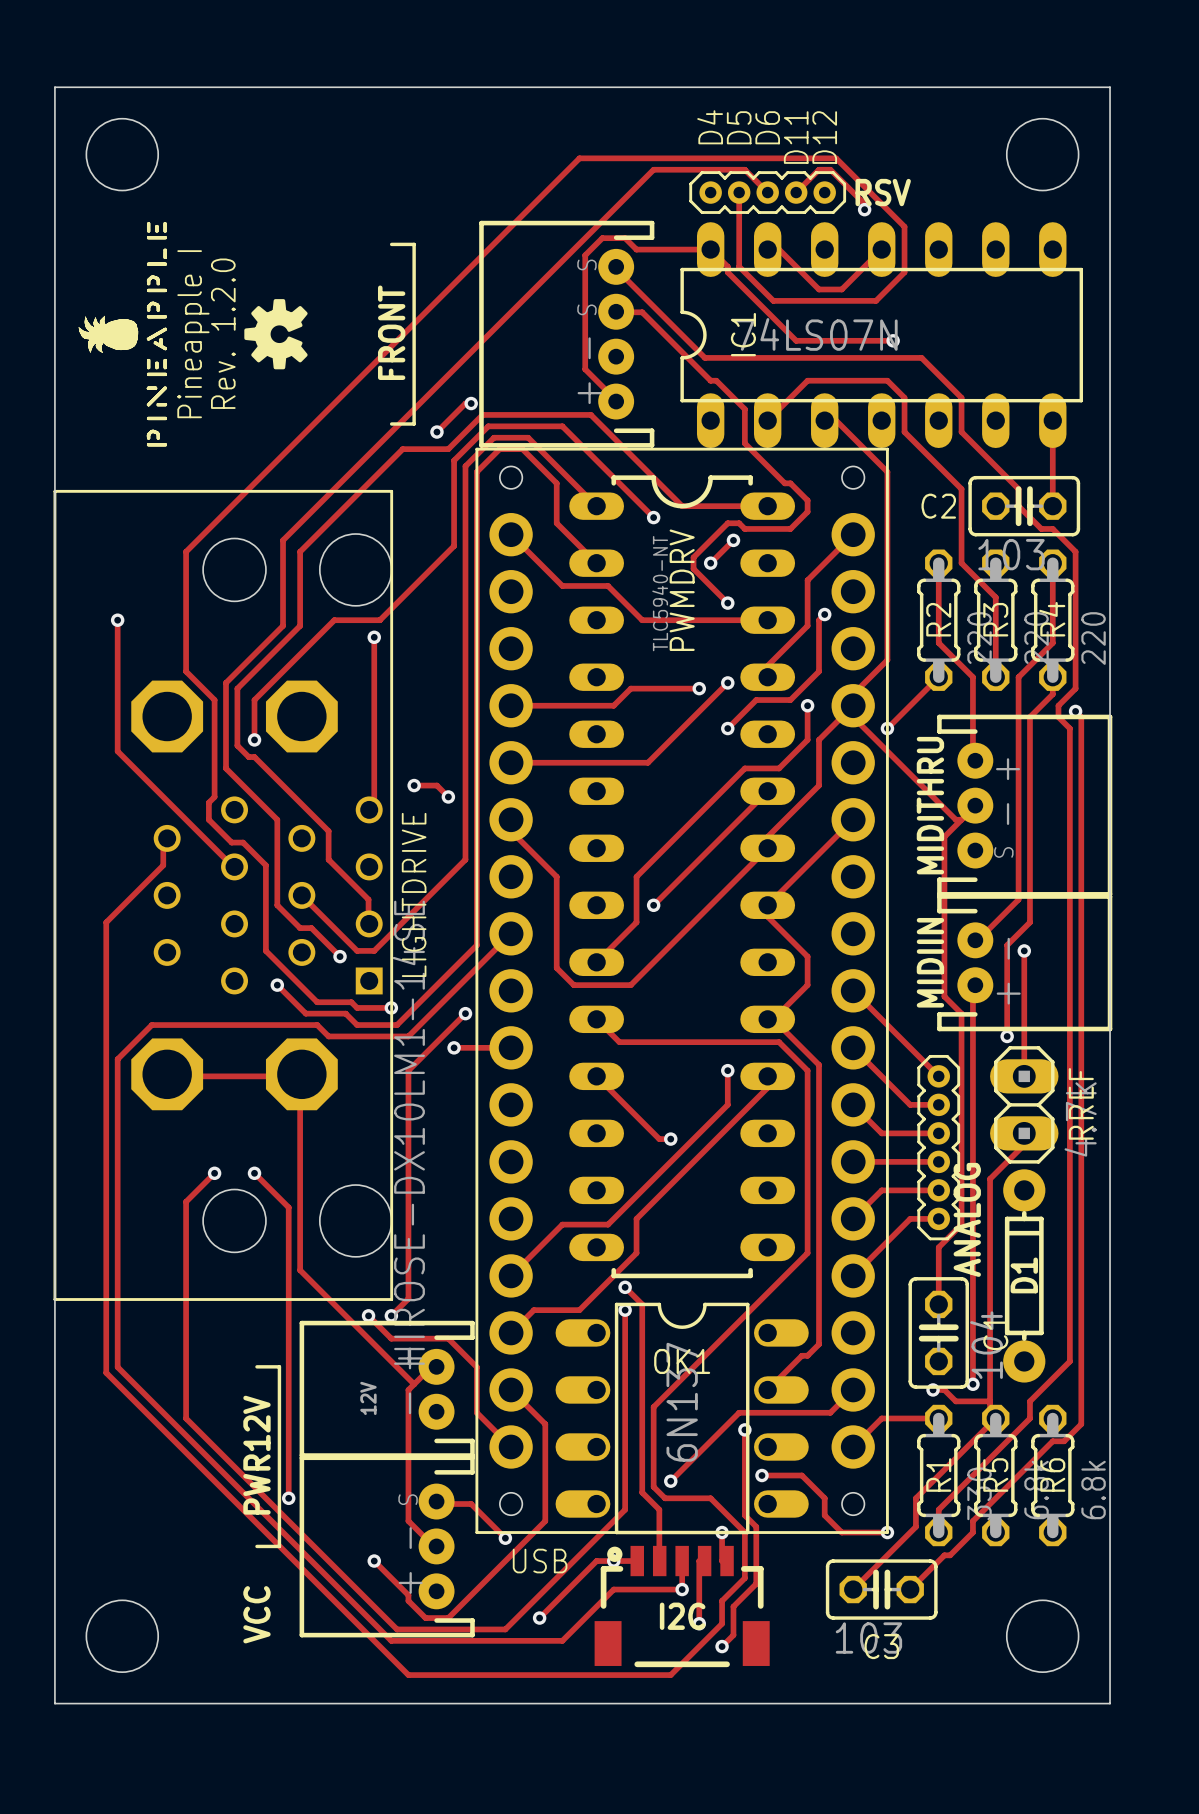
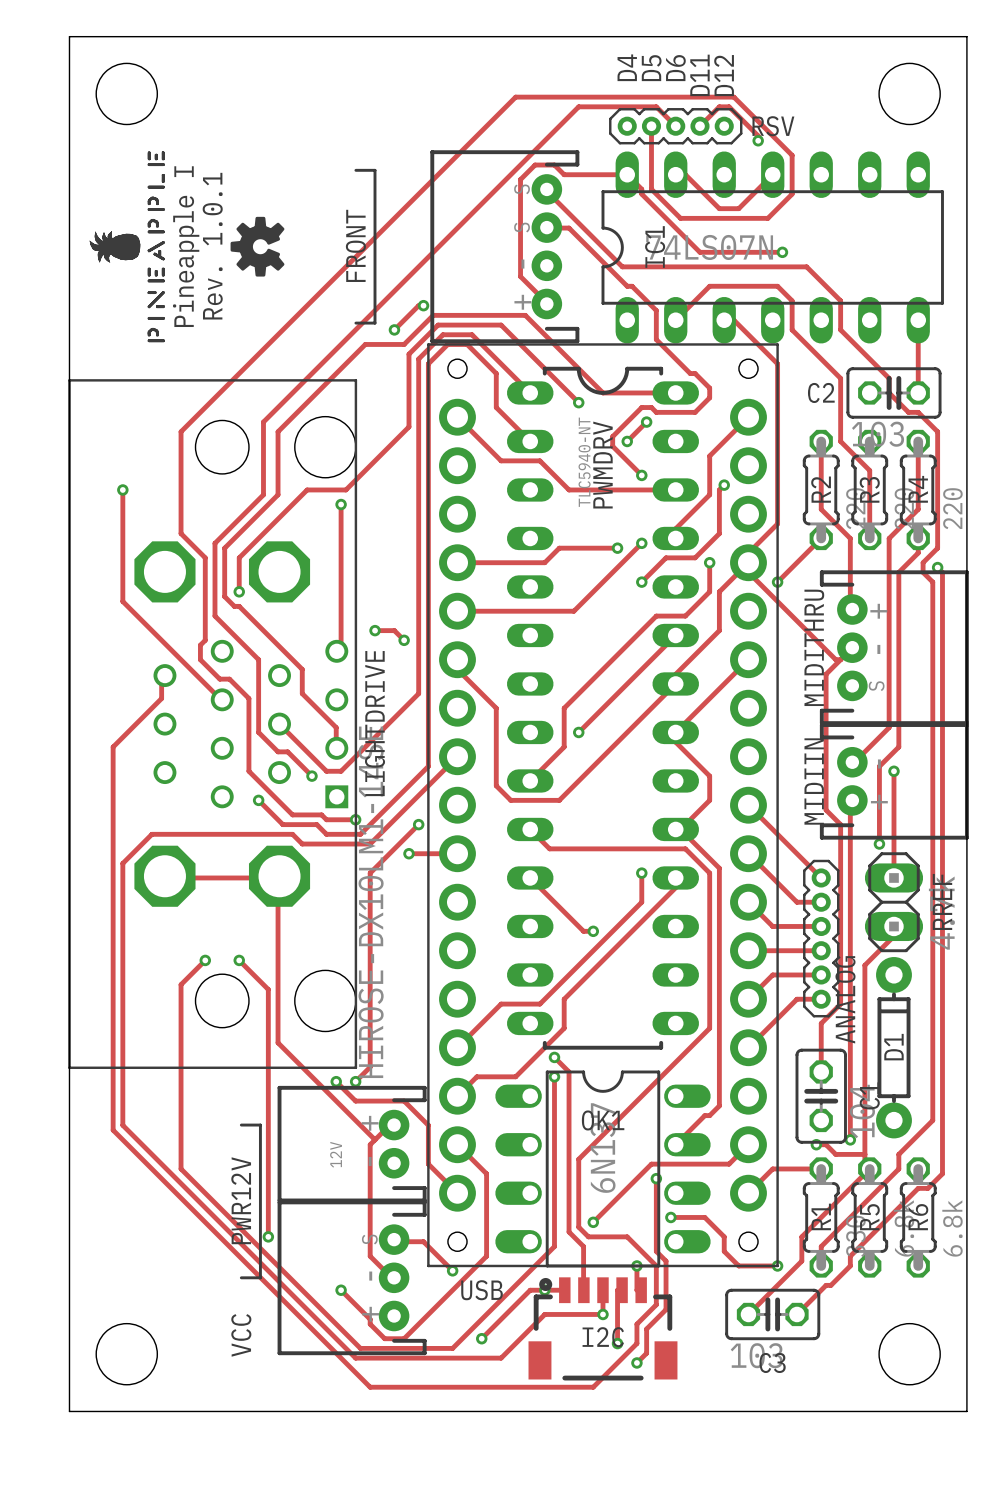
text: Rev. 1.2.0 (223, 333) -> Rev. 1.0.1 (212, 246)

